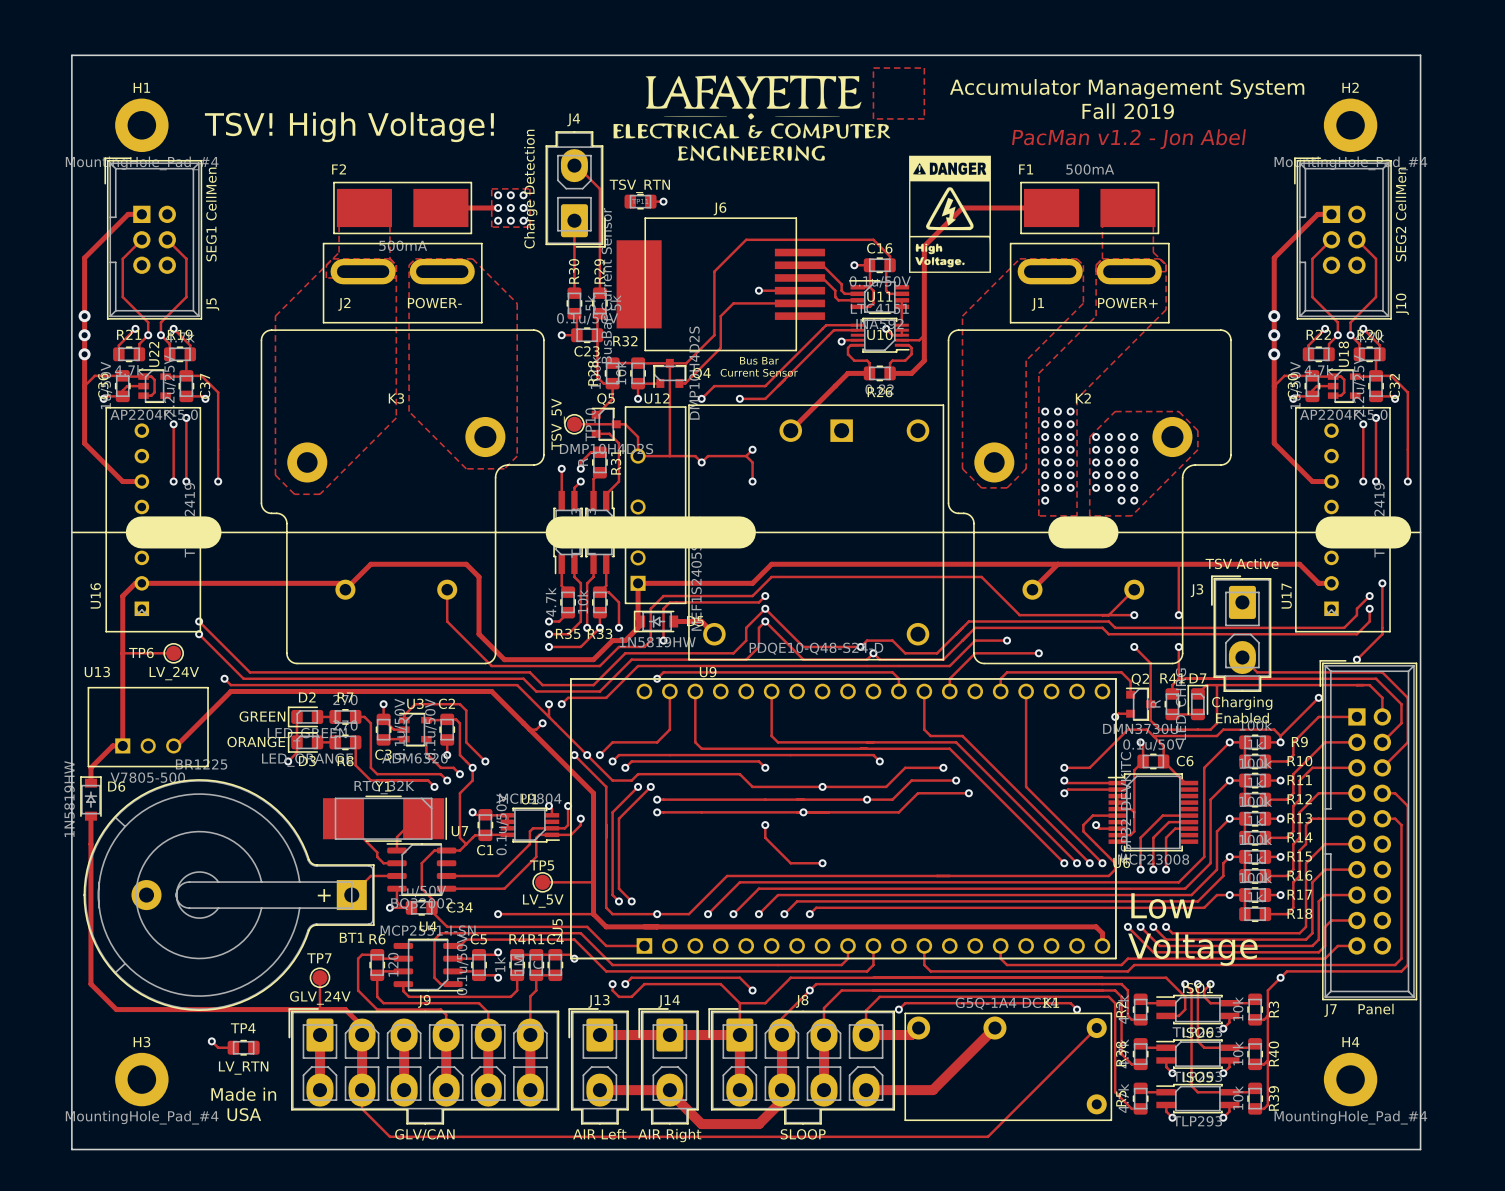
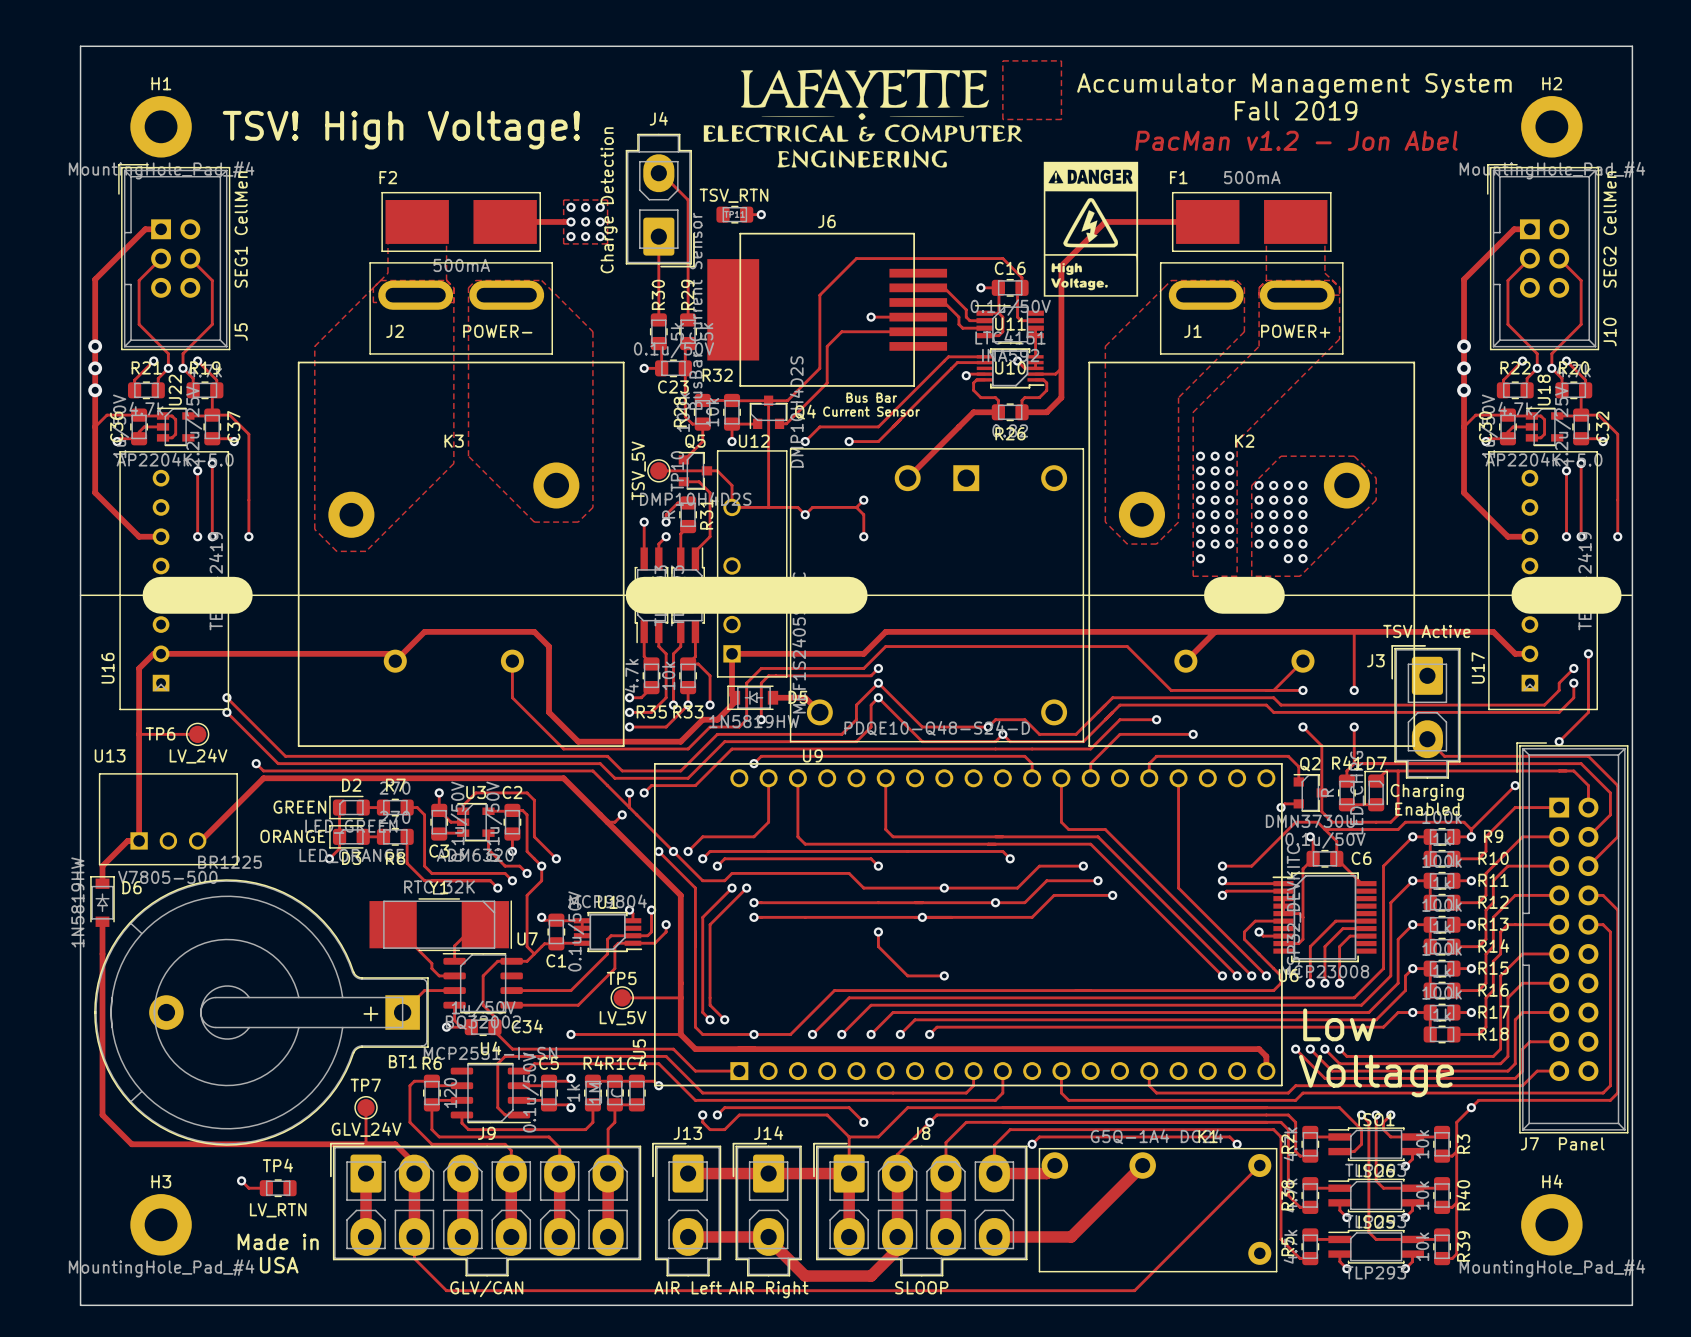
K3 footprint: [260, 329, 545, 665] -> [297, 361, 625, 747]
K2 footprint: [947, 329, 1232, 665] -> [1088, 361, 1416, 747]

